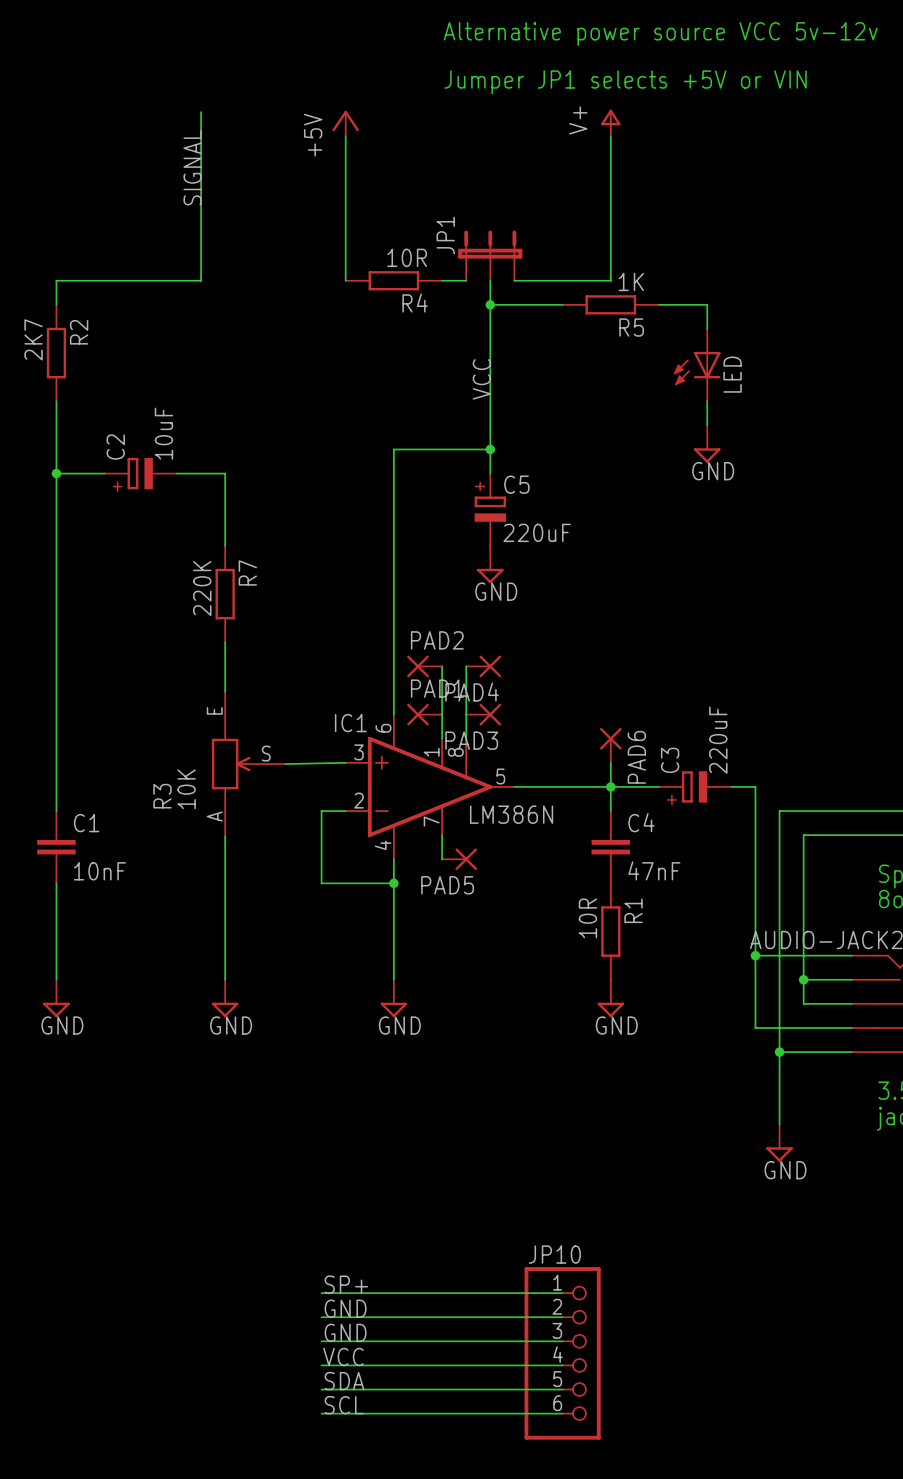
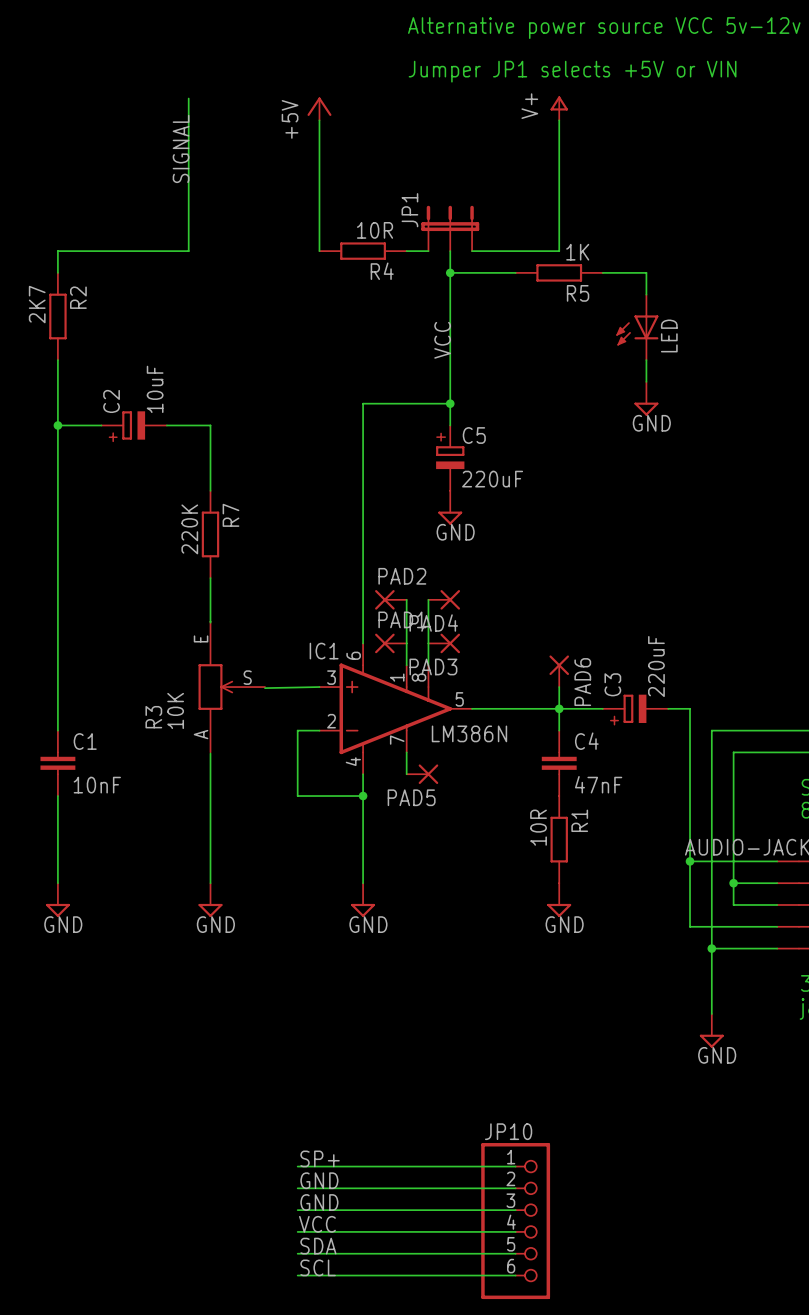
R3 symbol: [211, 691, 286, 837] -> [198, 621, 265, 753]

